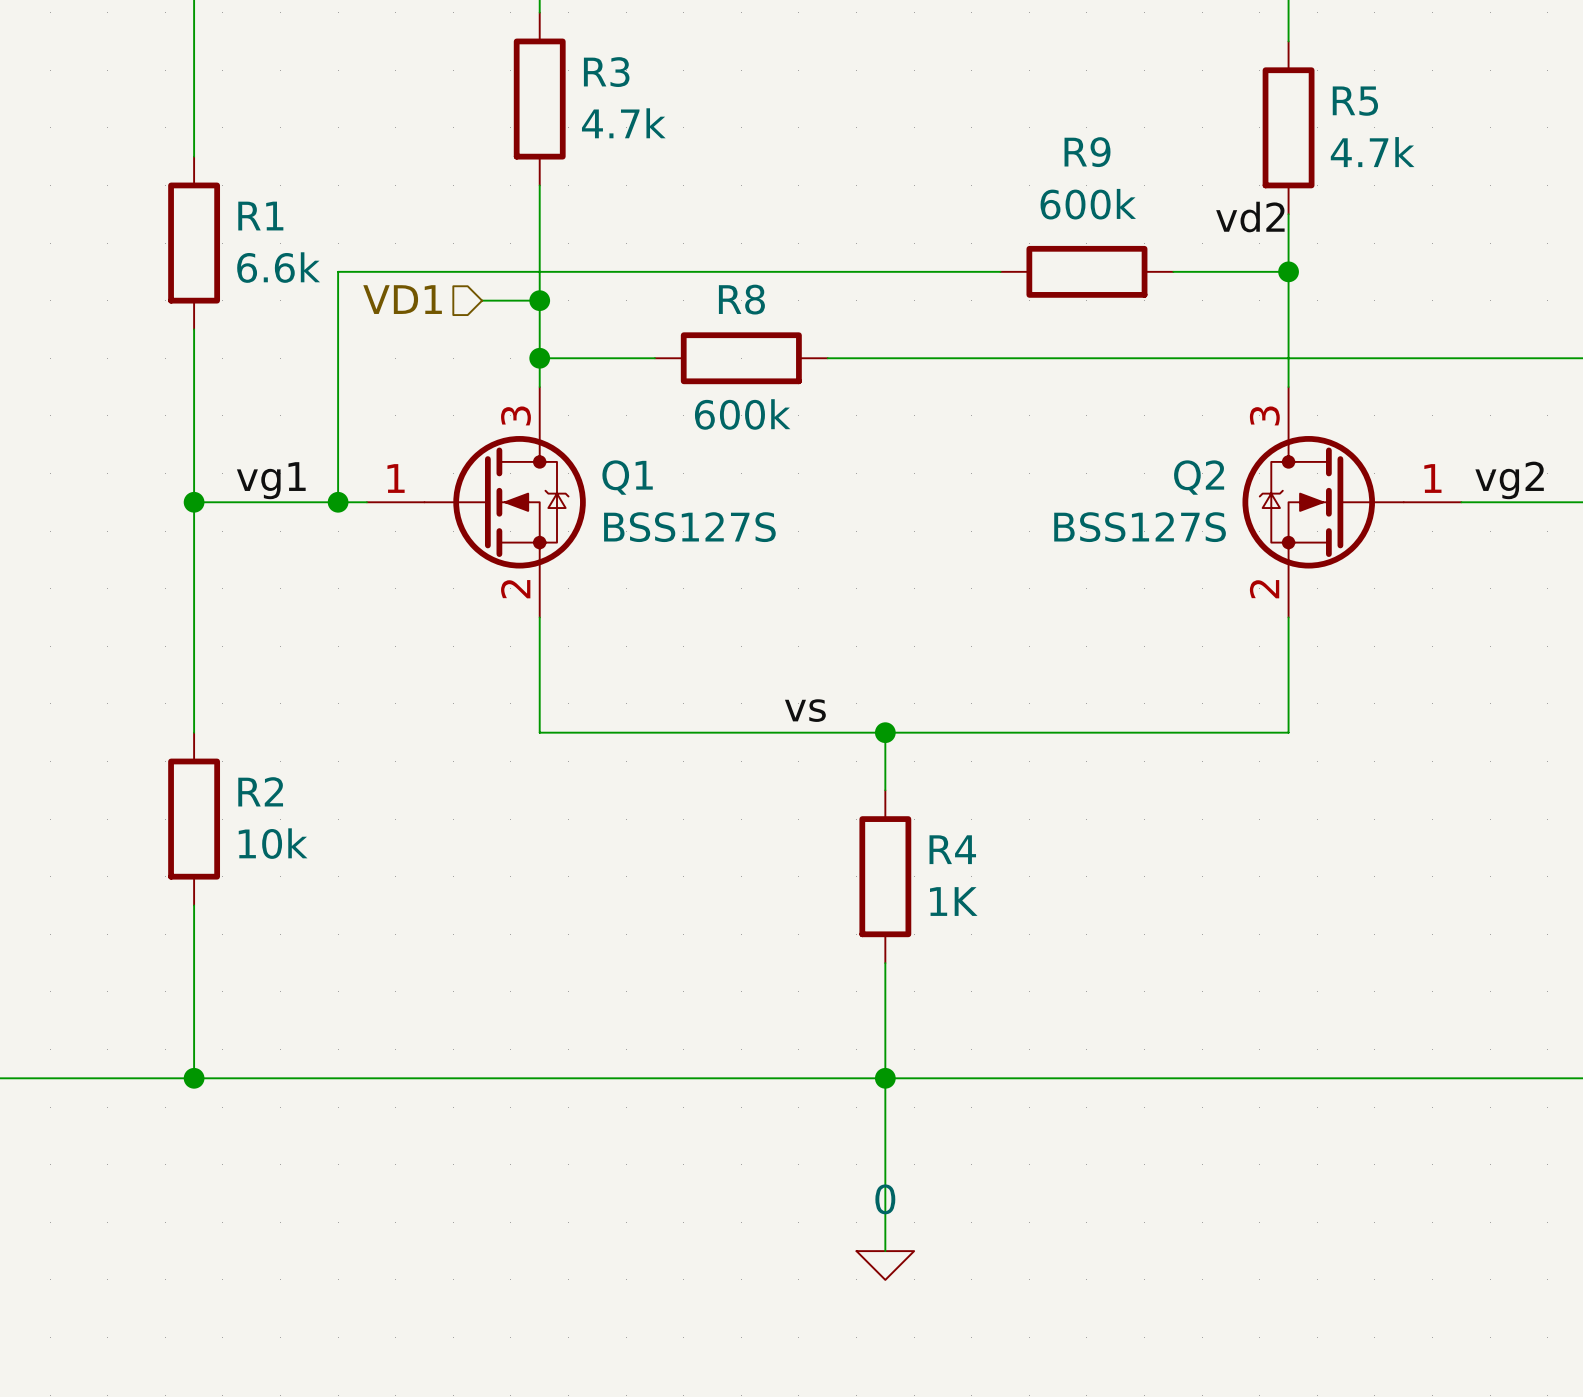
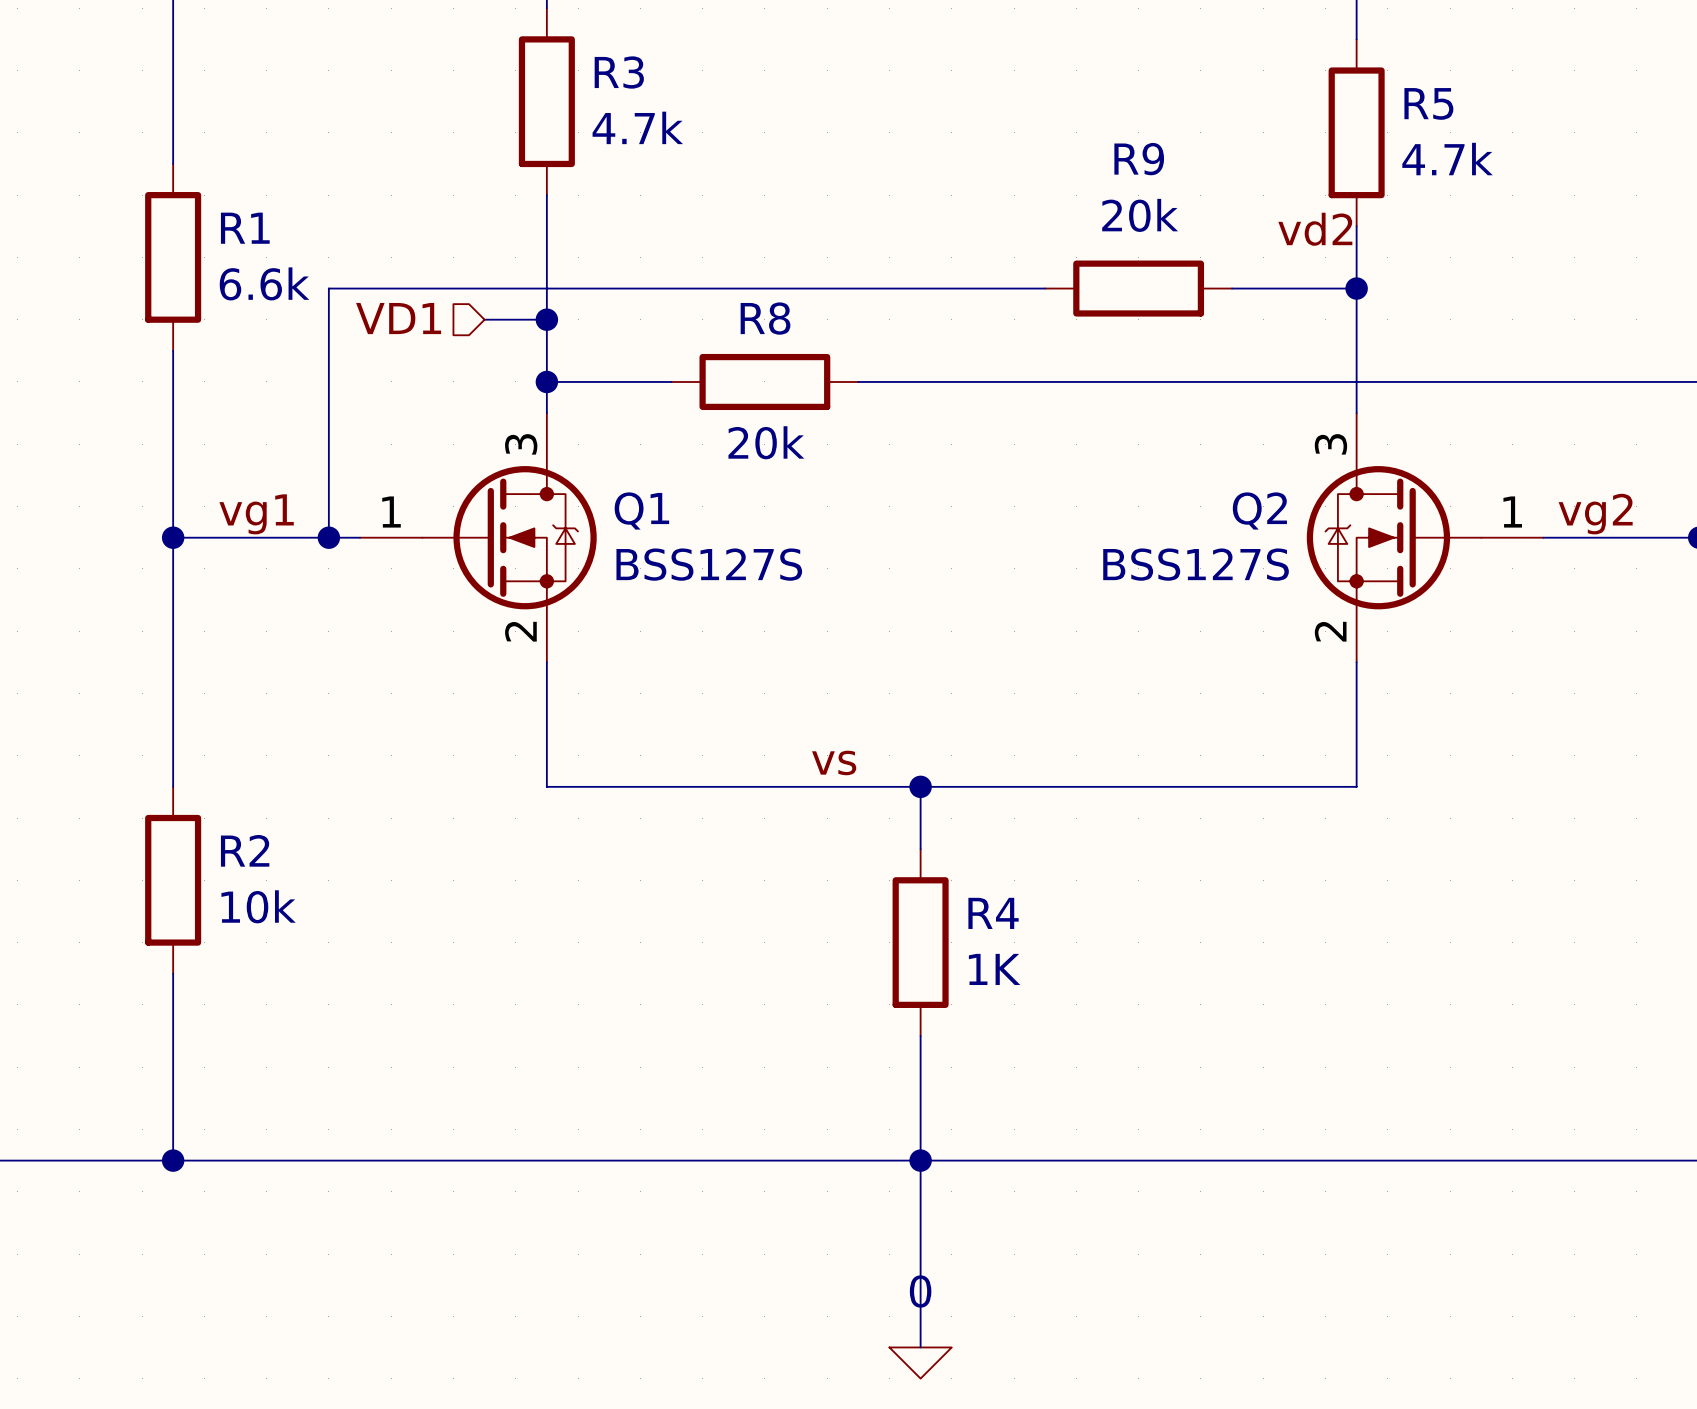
R9 value: 600k (1088, 204) -> 20k (1140, 215)
R8 value: 600k (742, 414) -> 20k (766, 442)

